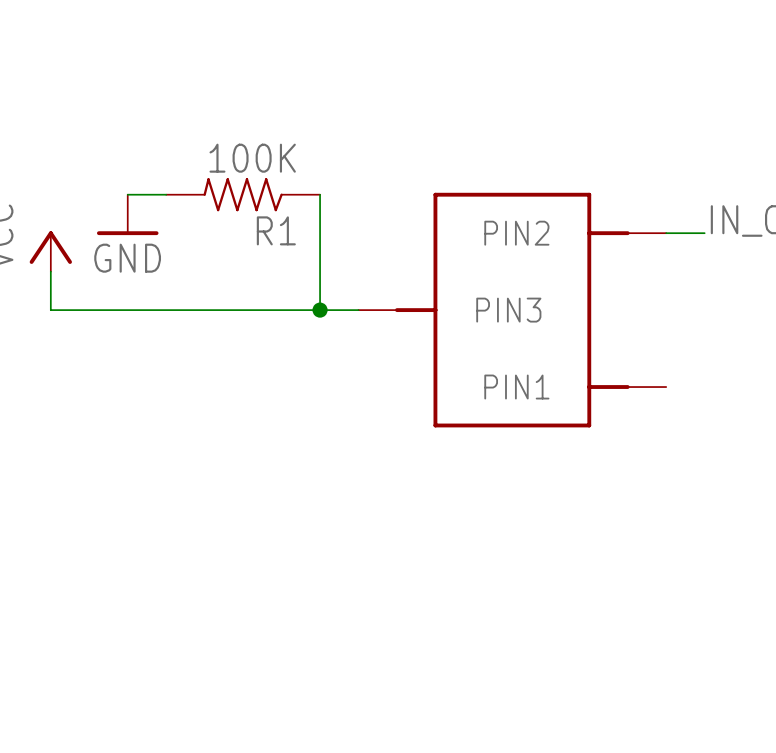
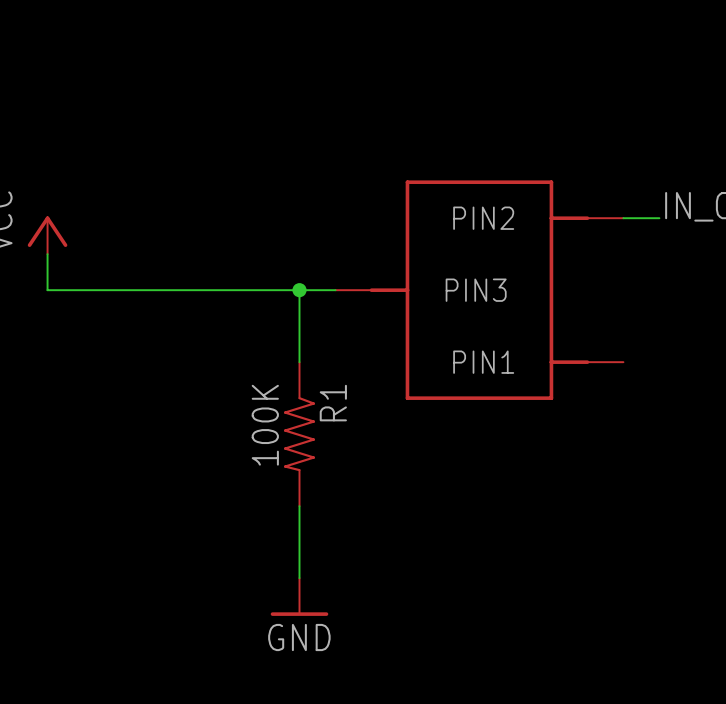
wire: (127, 194) (166, 194) -> none
R1 rotation: 0° (243, 194) -> 90° counterclockwise (299, 434)
R1 position: (243, 194) -> (299, 434)
wire: (320, 194) (320, 310) -> (299, 362) (299, 290)
power symbol: GND (127, 214) -> none
wire: none -> (299, 506) (299, 578)
power symbol: none -> GND (299, 597)

